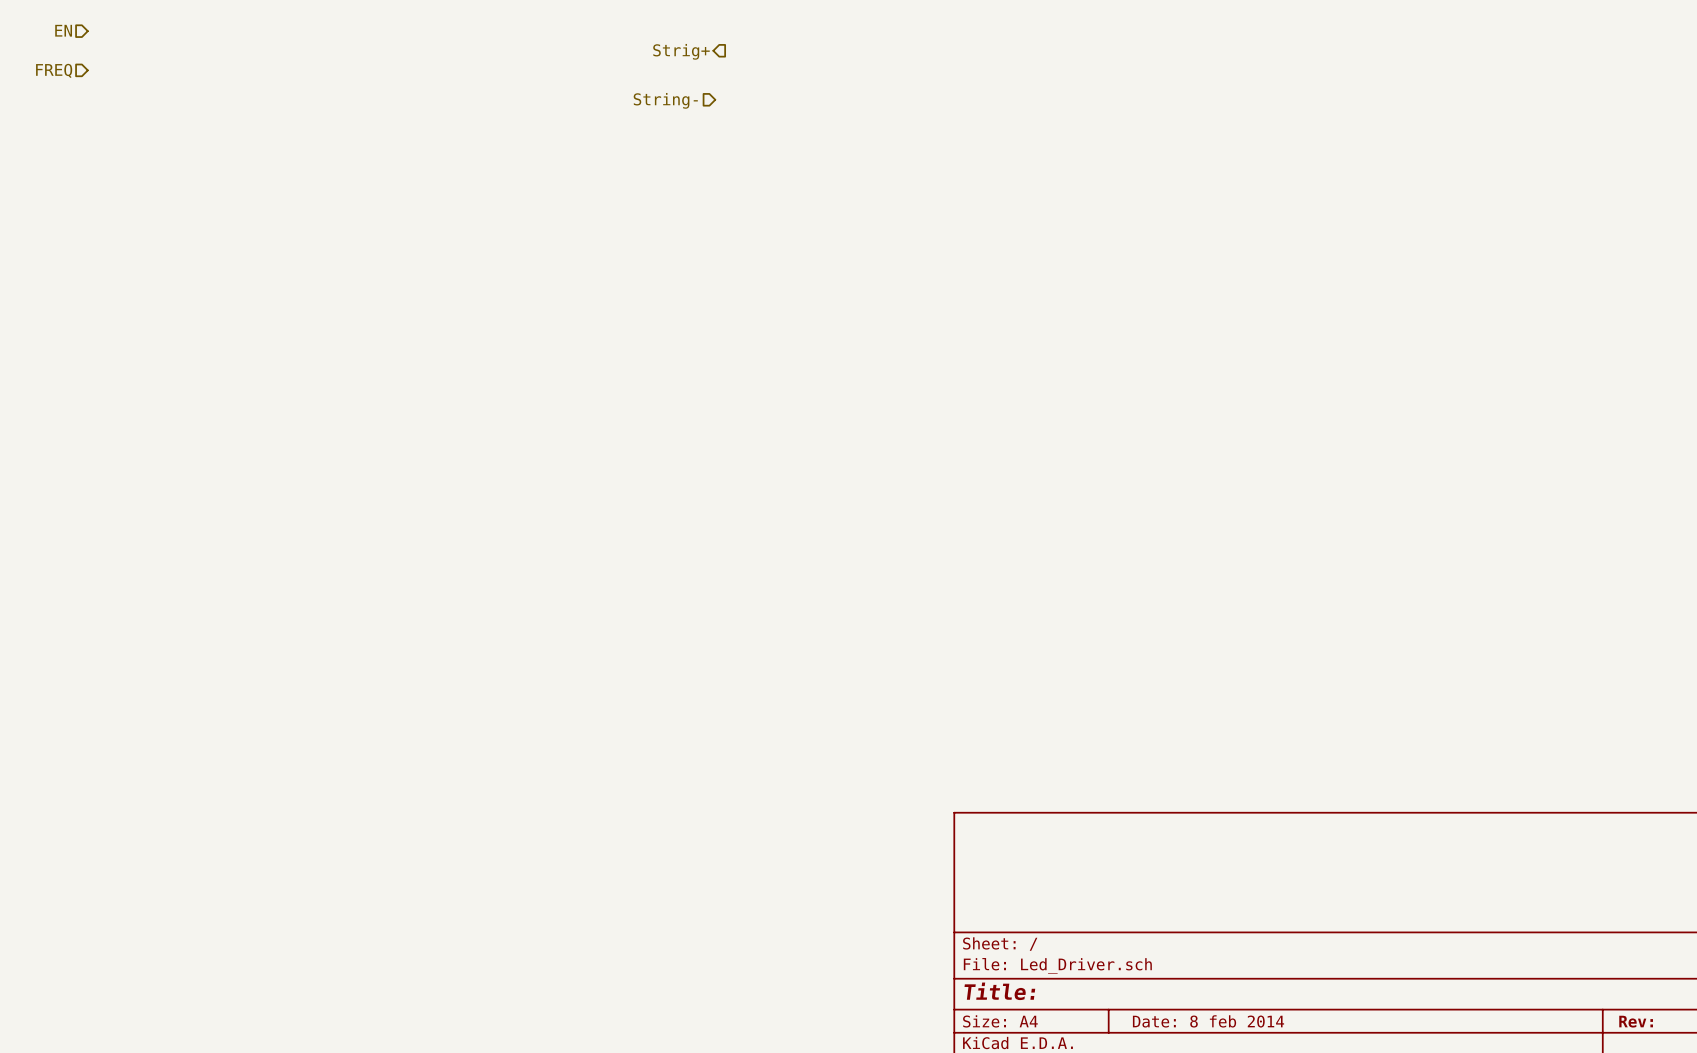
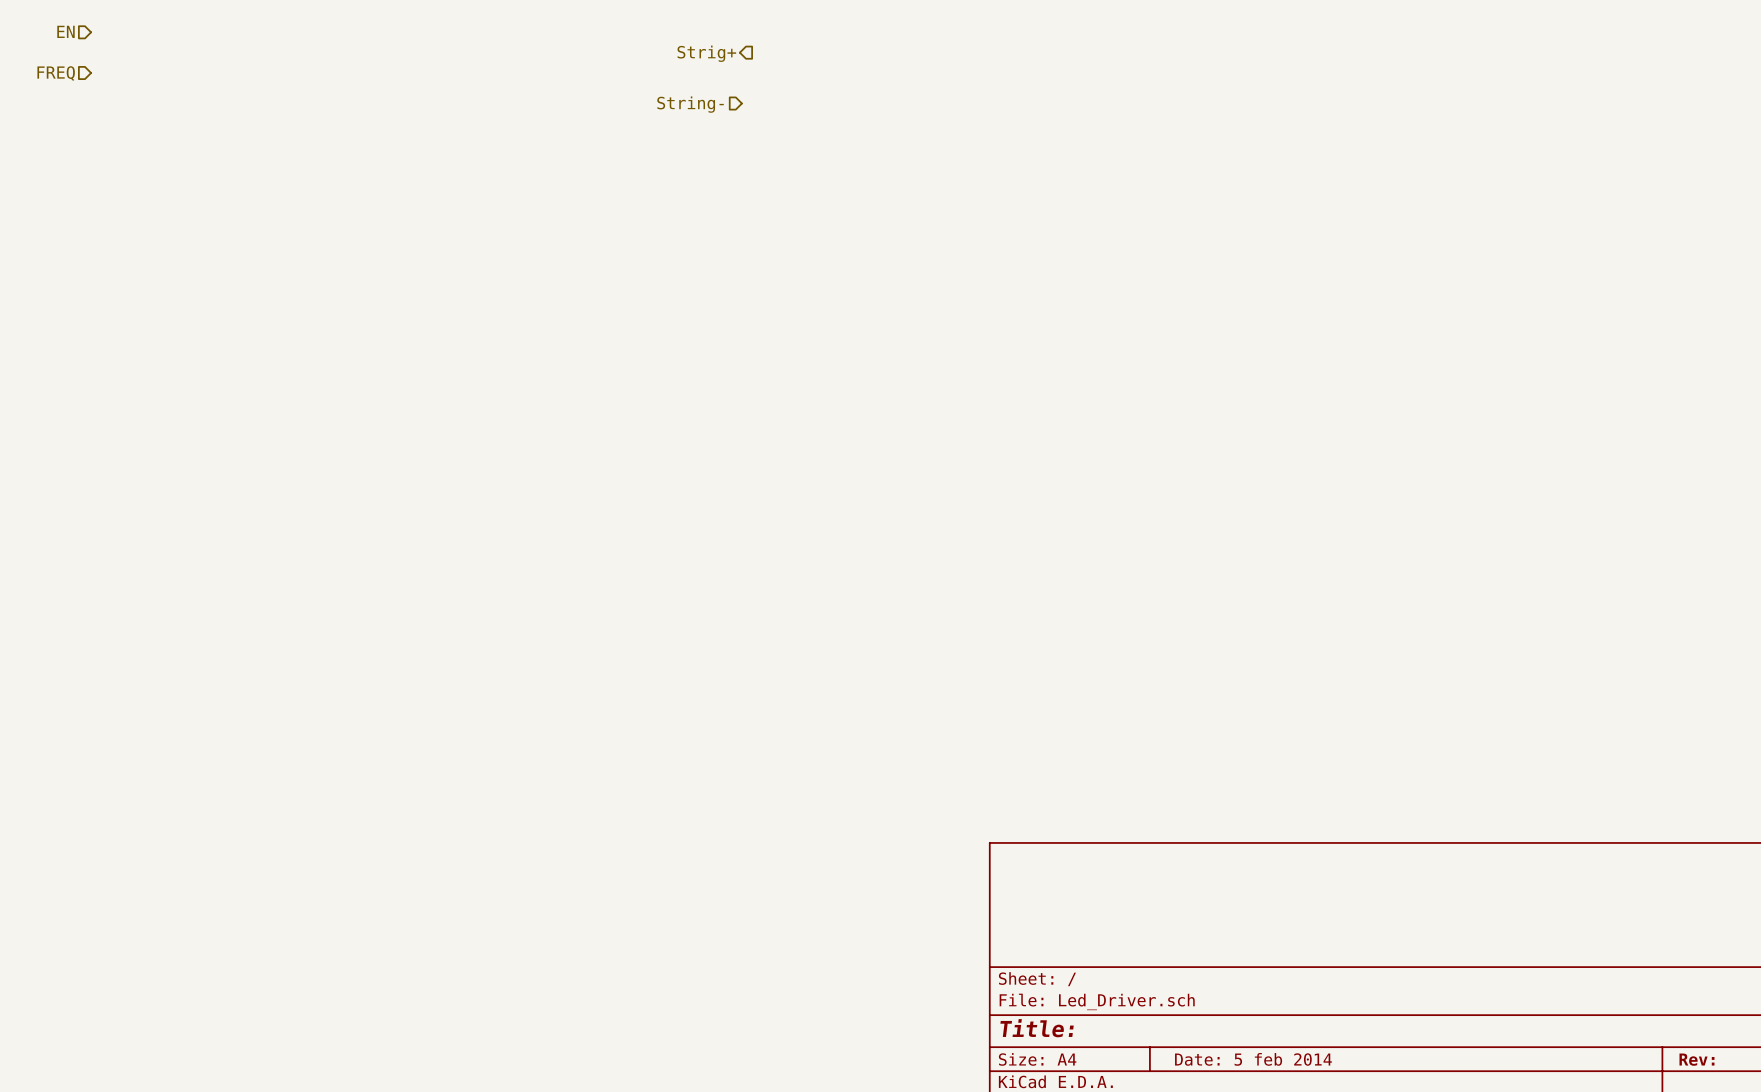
title block: Date: 8 feb 2014 (1208, 1021) -> Date: 5 feb 2014 (1253, 1059)

